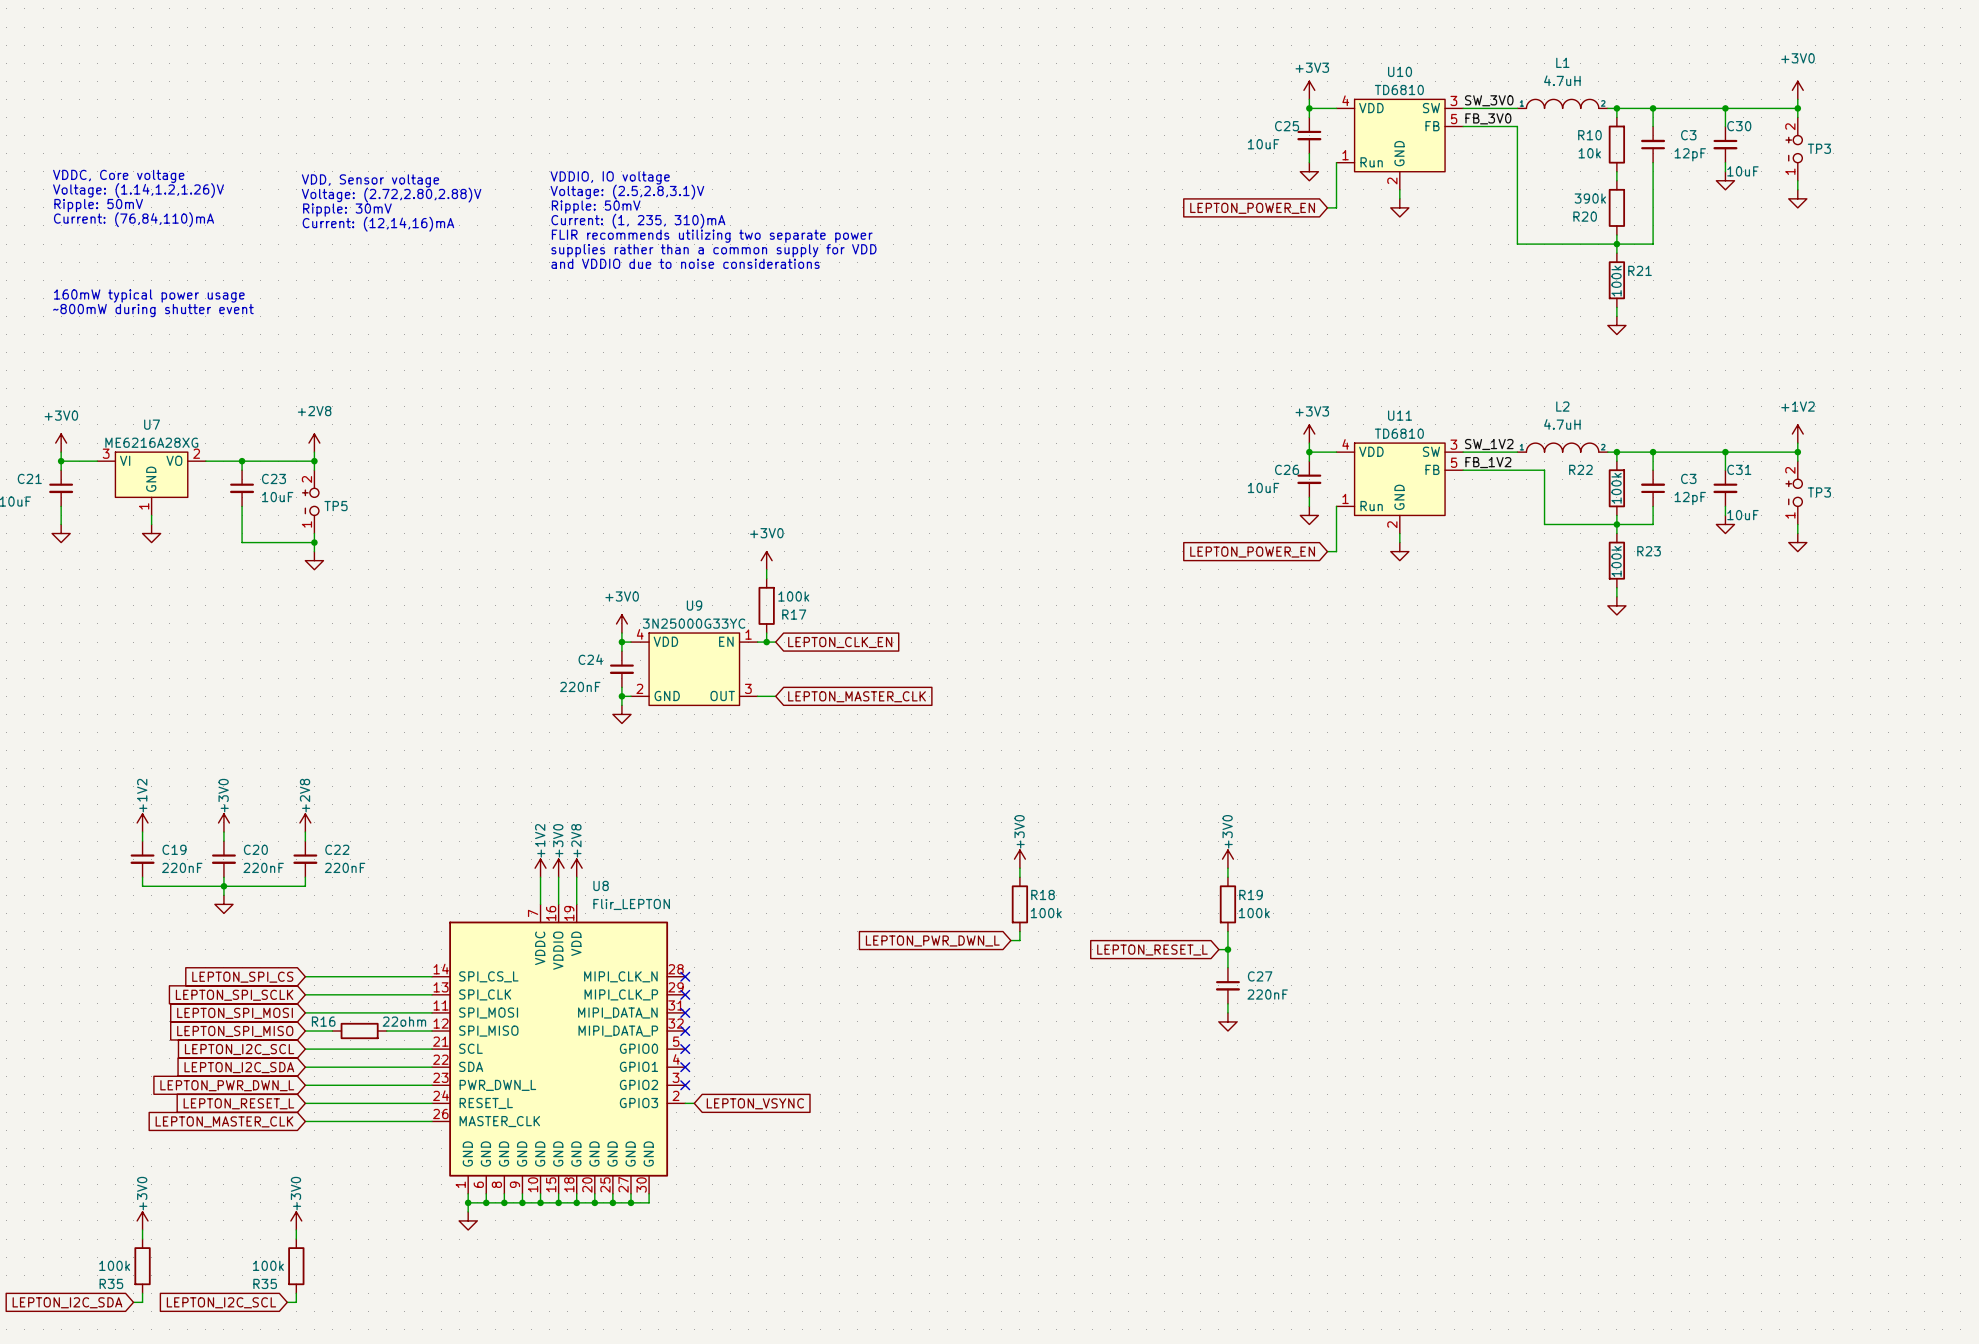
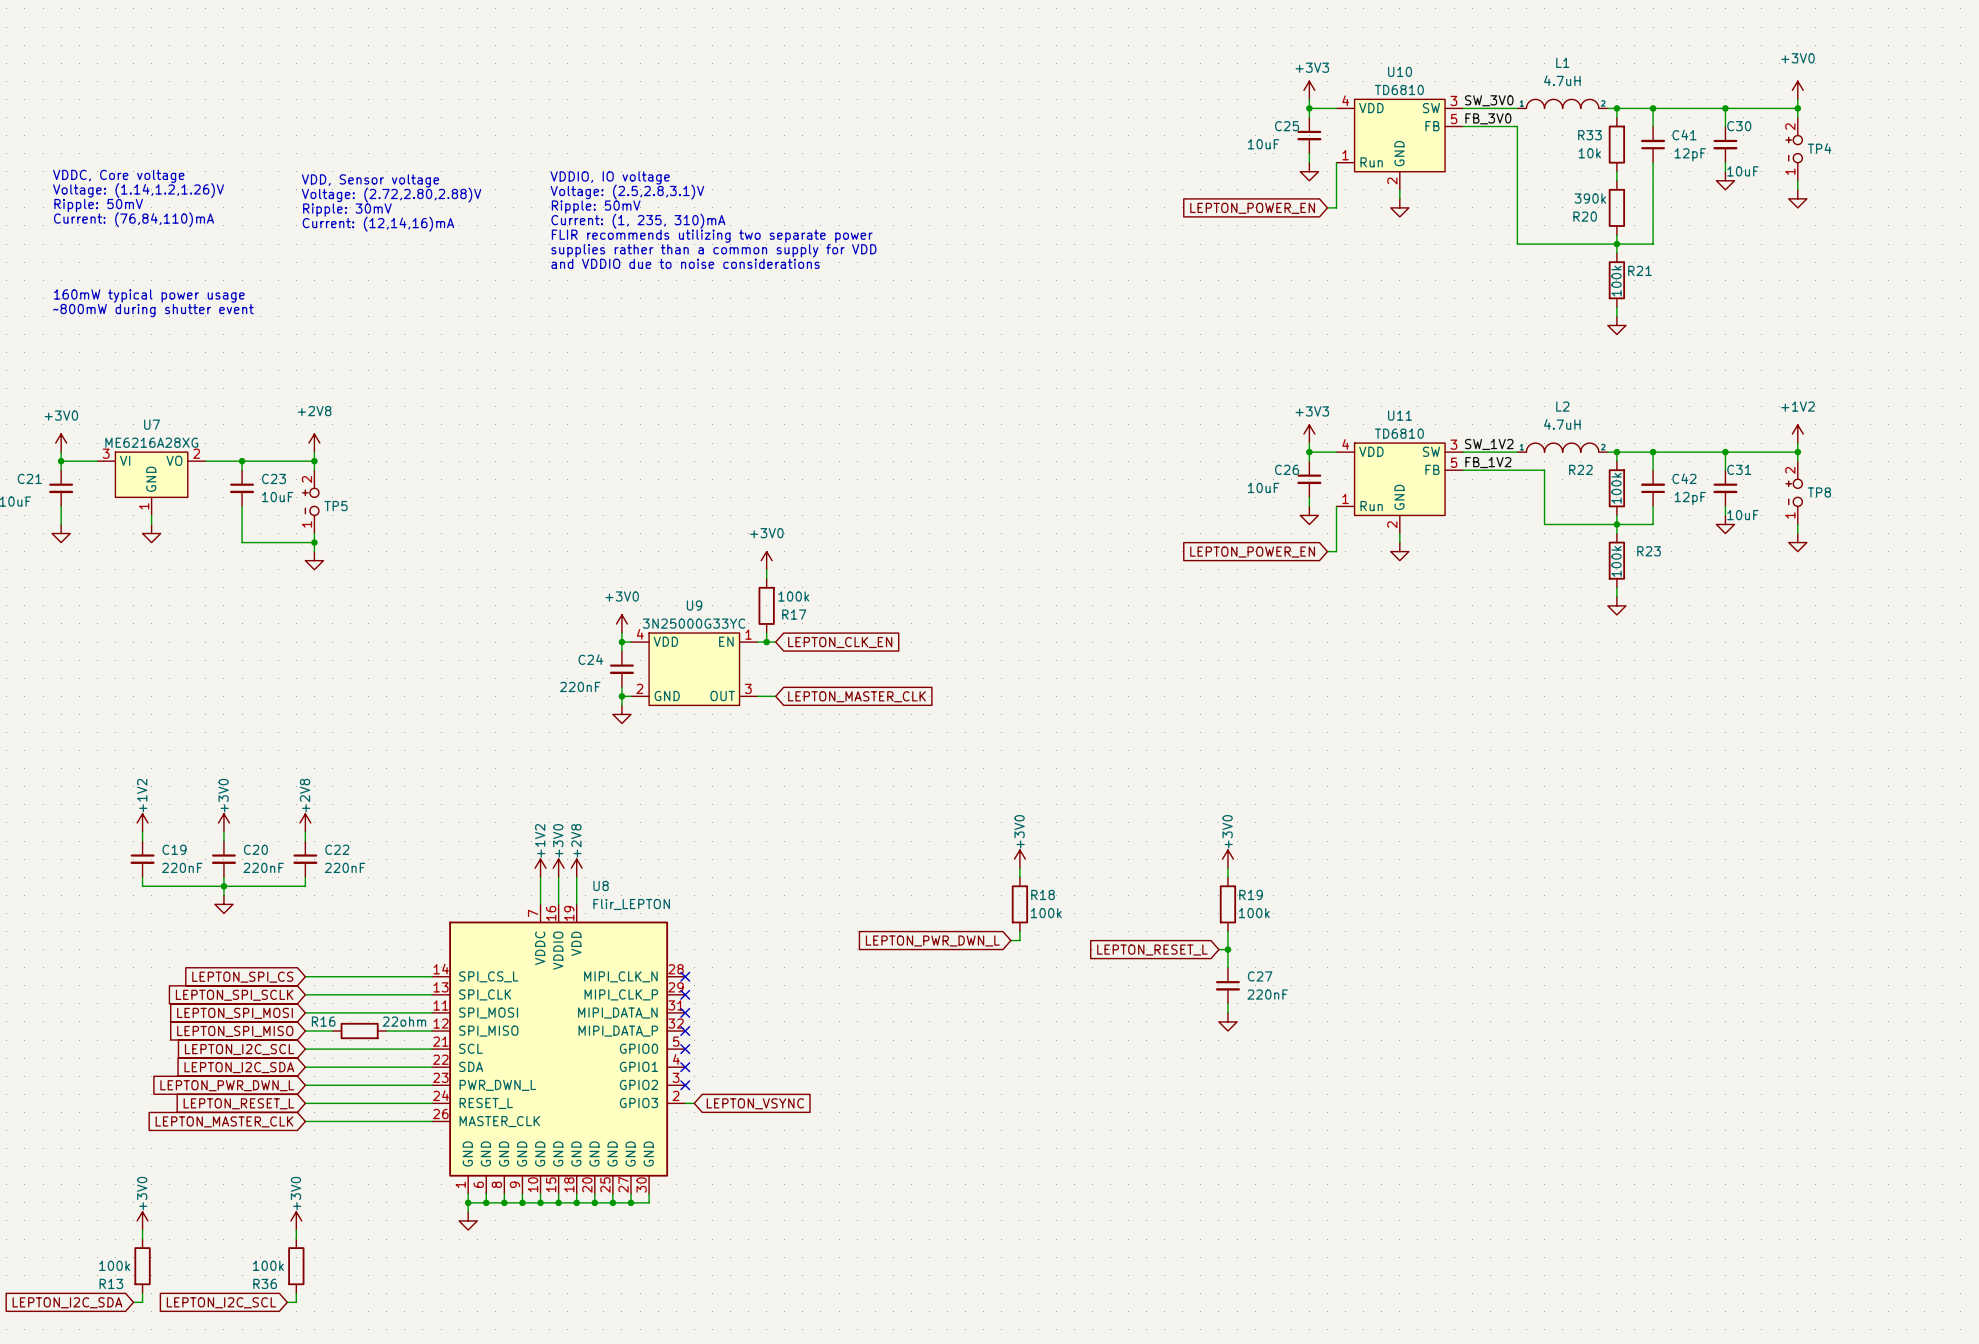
R10 name: R10 (1589, 135) -> R33 (1589, 135)
C3 name: C3 (1688, 135) -> C41 (1684, 134)
TP3 name: TP3 (1819, 148) -> TP4 (1819, 148)
C3 name: C3 (1688, 478) -> C42 (1684, 478)
TP3 name: TP3 (1819, 492) -> TP8 (1819, 492)
R35 name: R35 (111, 1283) -> R13 (111, 1283)
R35 name: R35 (265, 1283) -> R36 (265, 1283)

